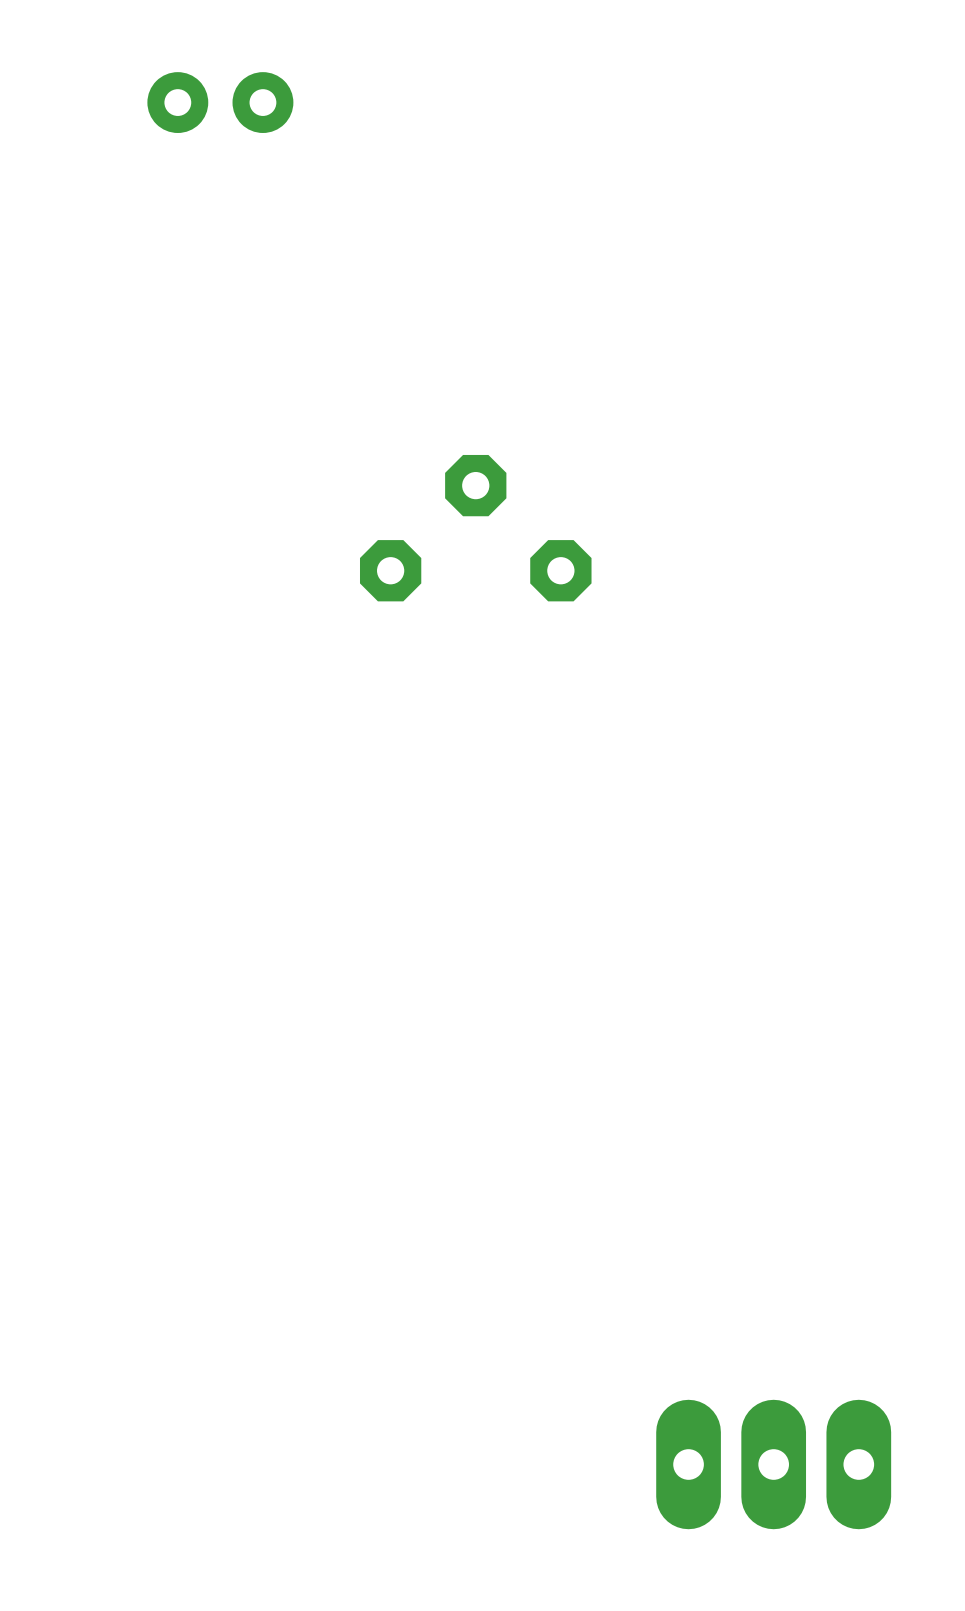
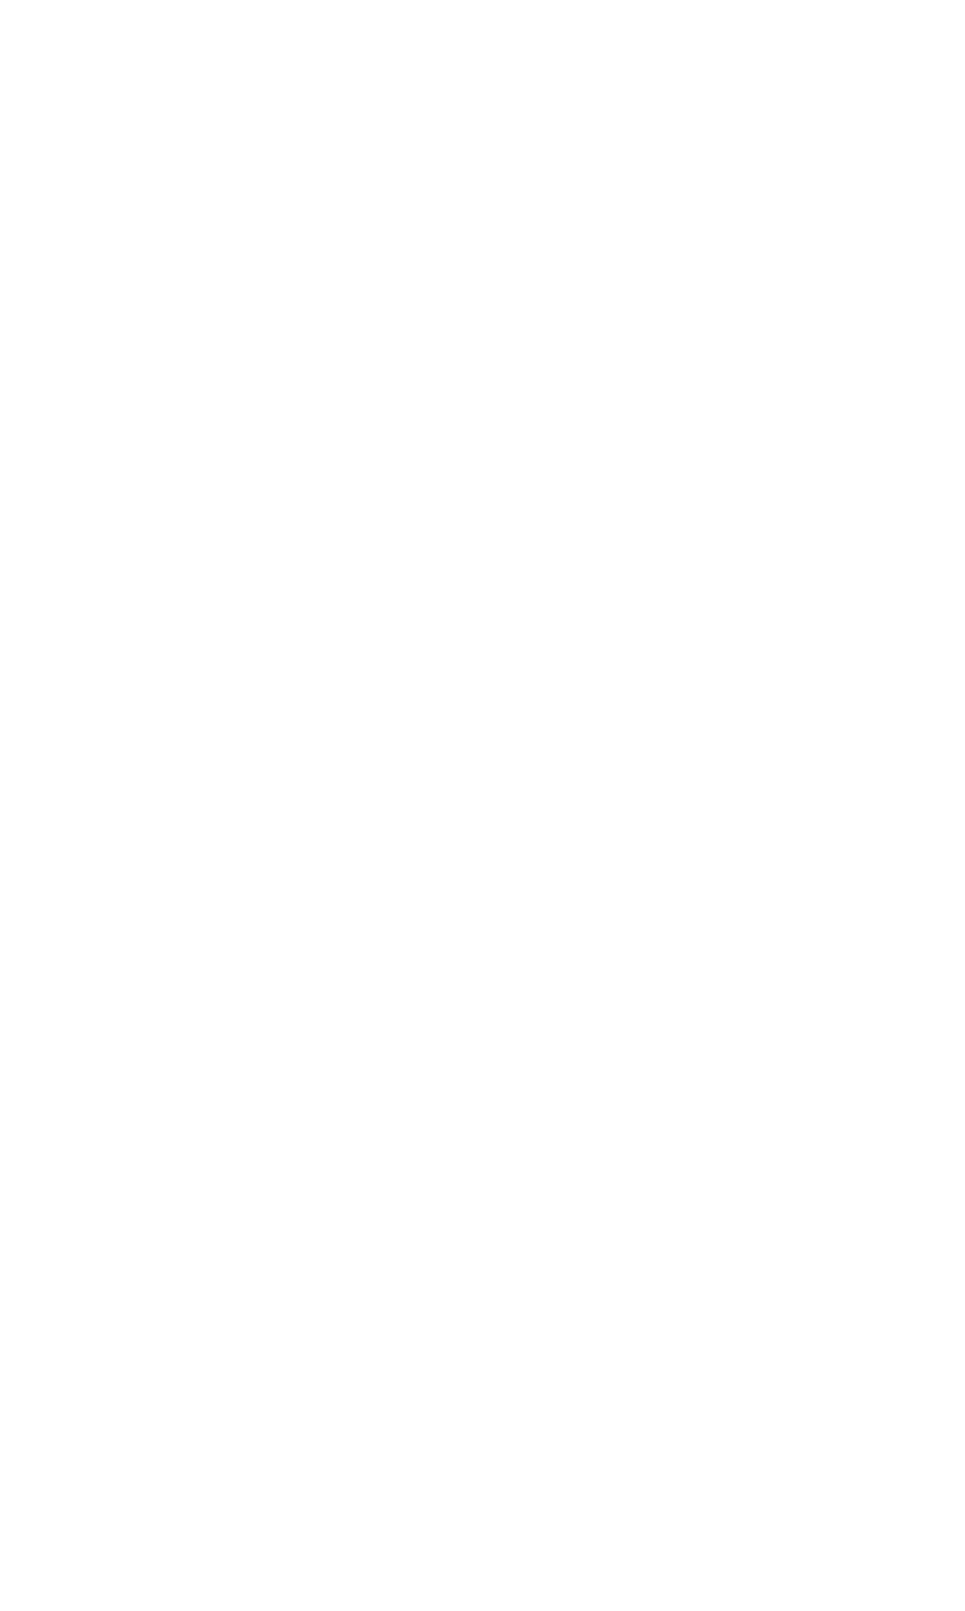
part: (220, 102) -> none
part: (475, 528) -> none
part: (773, 1464) -> none

